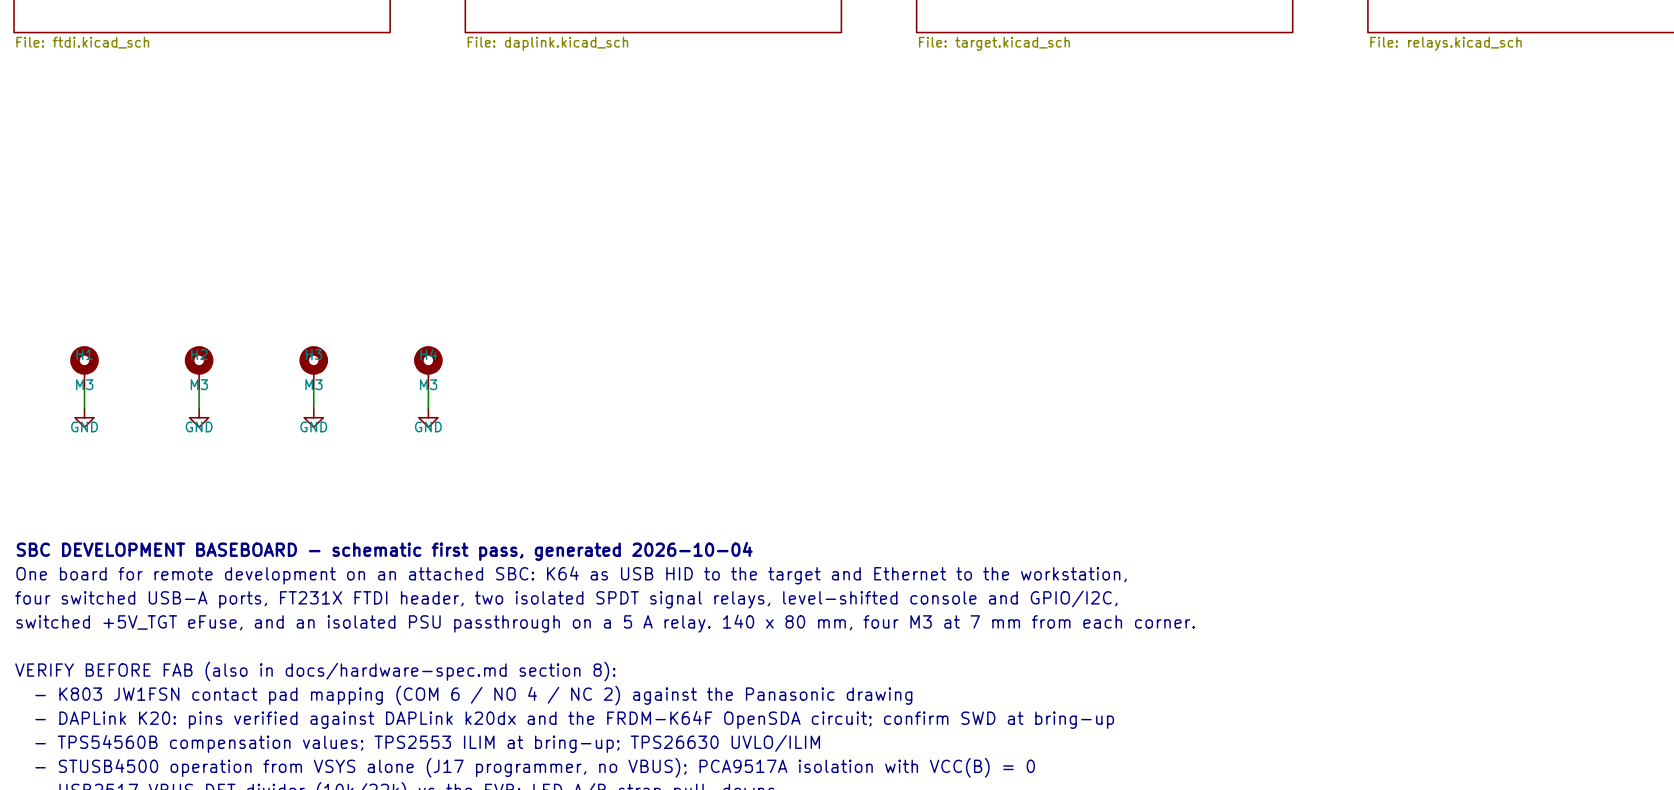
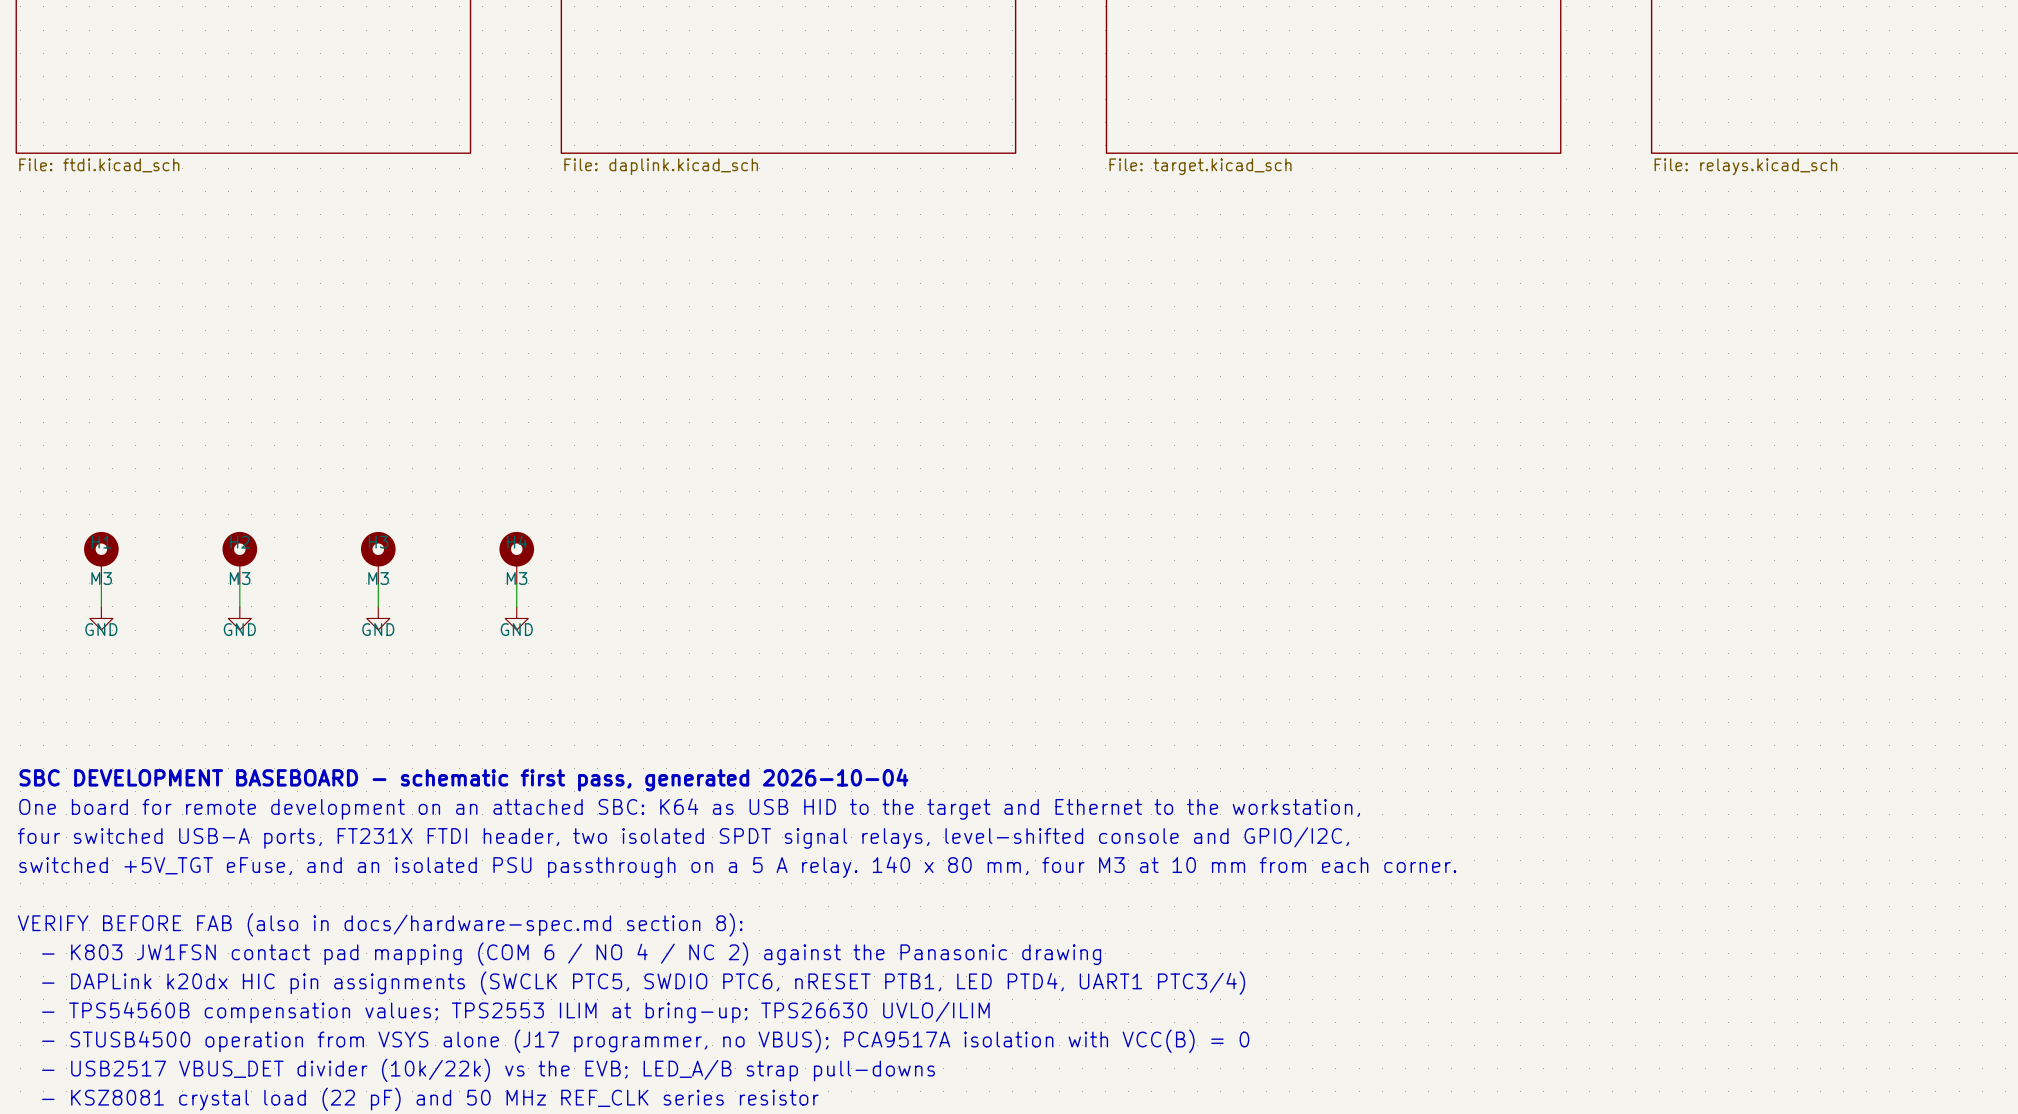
text: switched +5V_TGT eFuse, and an isolated PSU passthrough on a 5 A relay. 140 x 80 mm, four M3 at 7 mm from each corner. (605, 623) -> switched +5V_TGT eFuse, and an isolated PSU passthrough on a 5 A relay. 140 x 80 mm, four M3 at 10 mm from each corner. (737, 867)
text: - DAPLink K20: pins verified against DAPLink k20dx and the FRDM-K64F OpenSDA circuit; confirm SWD at bring-up (574, 719) -> - DAPLink k20dx HIC pin assignments (SWCLK PTC5, SWDIO PTC6, nRESET PTB1, LED PTD4, UART1 PTC3/4) (643, 983)

